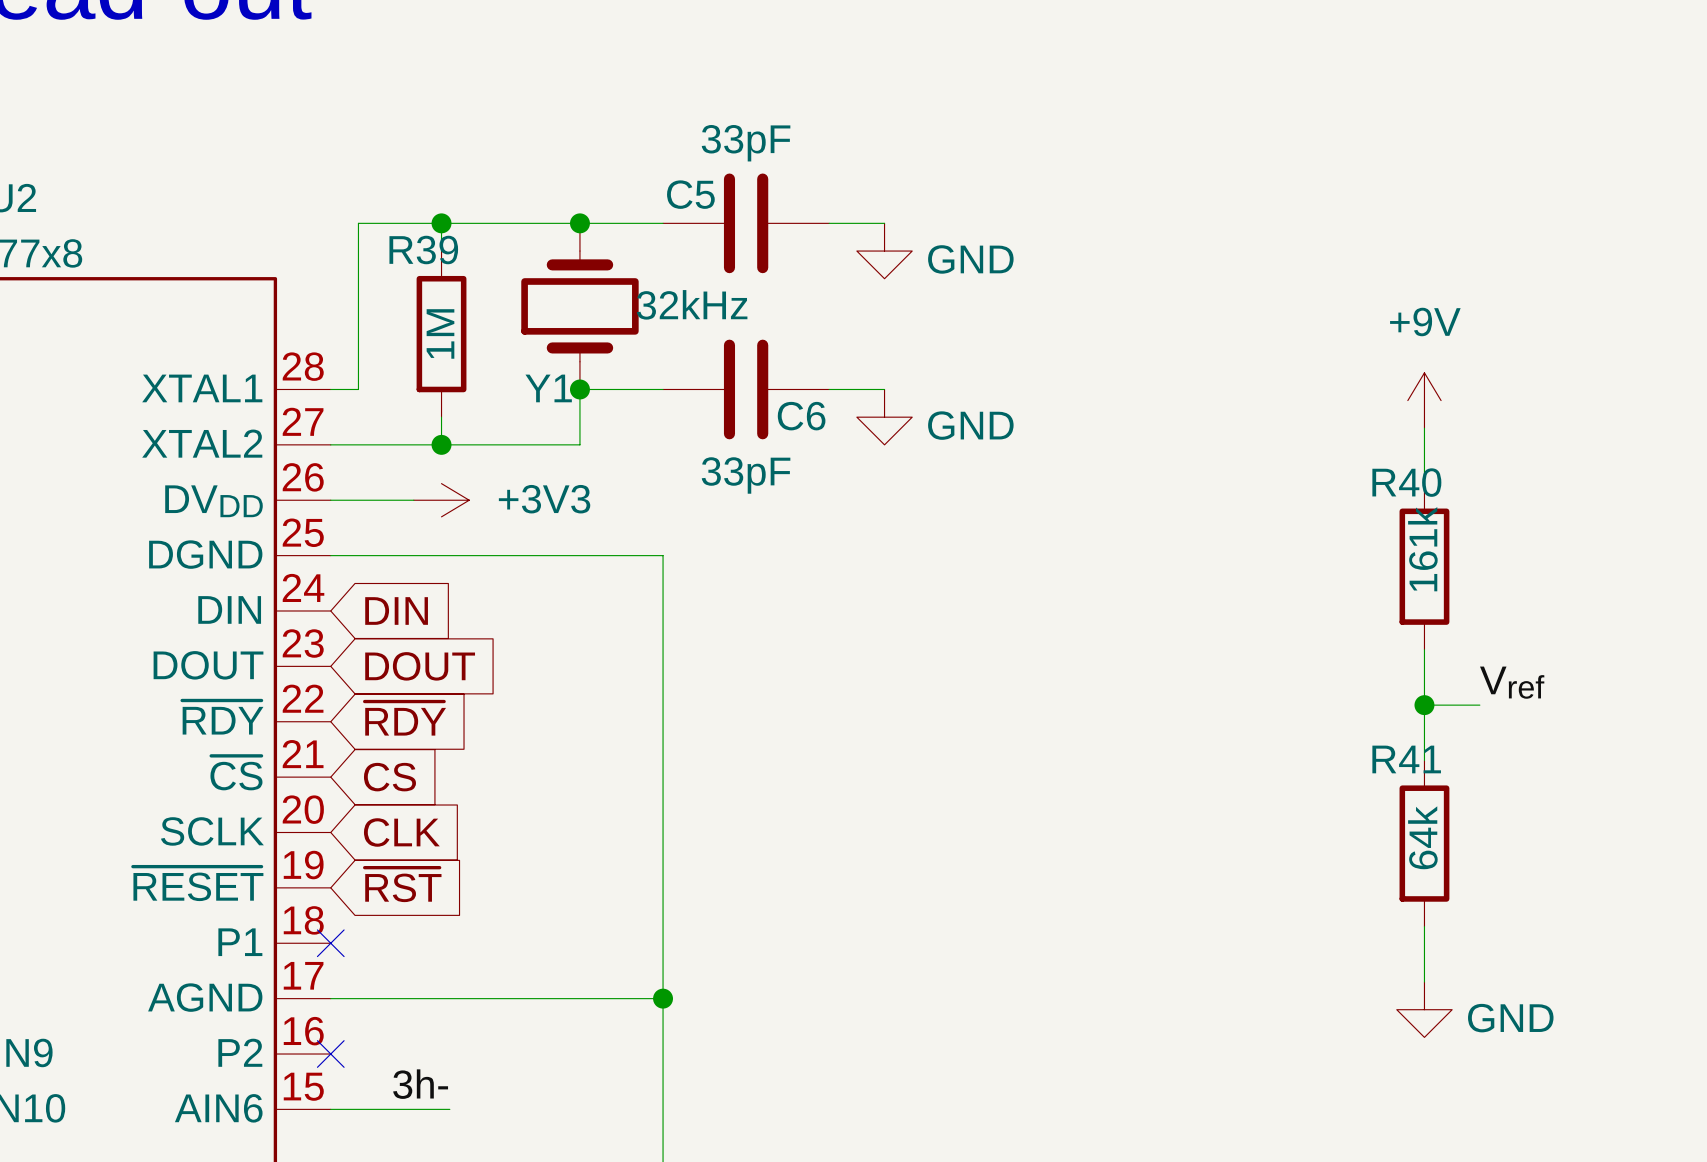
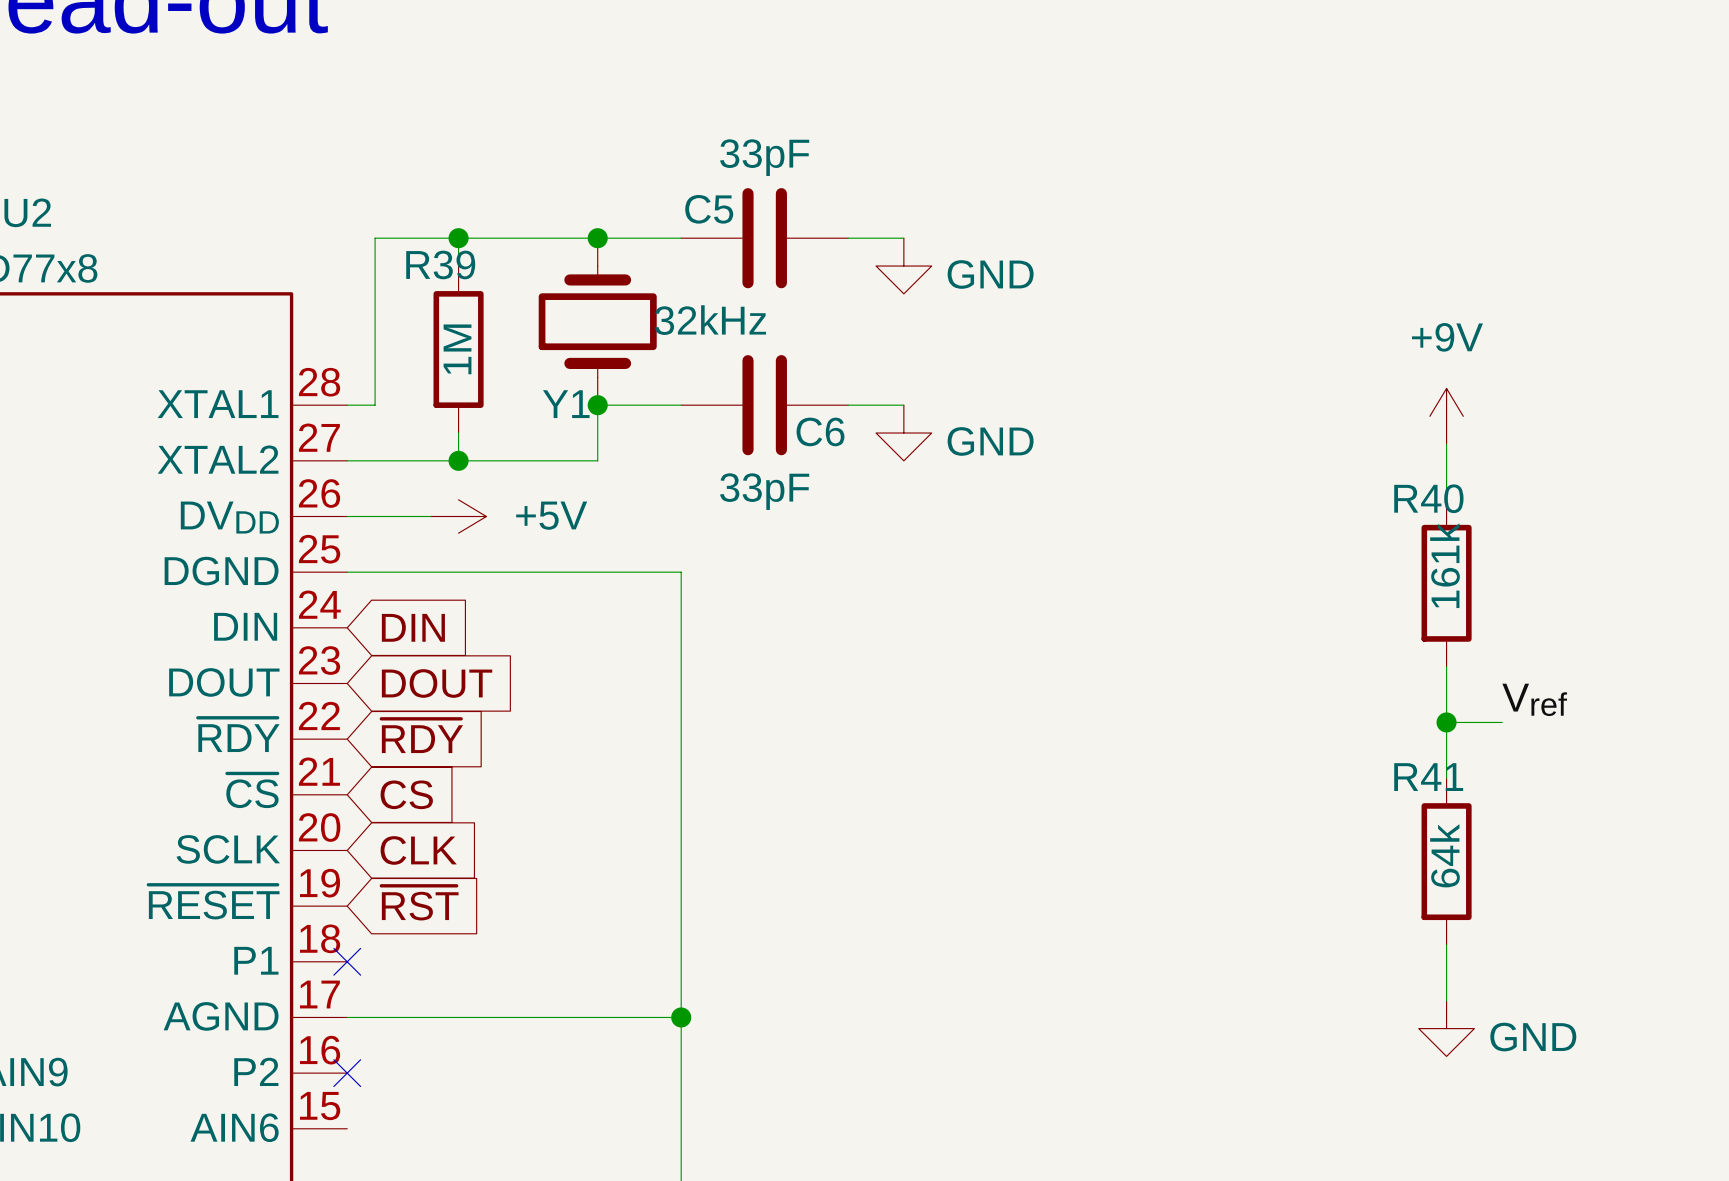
power symbol: +3V3 (441, 500) -> +5V (458, 516)
label: 3h- (420, 1084) -> none
wire: (330, 1109) (449, 1109) -> none

